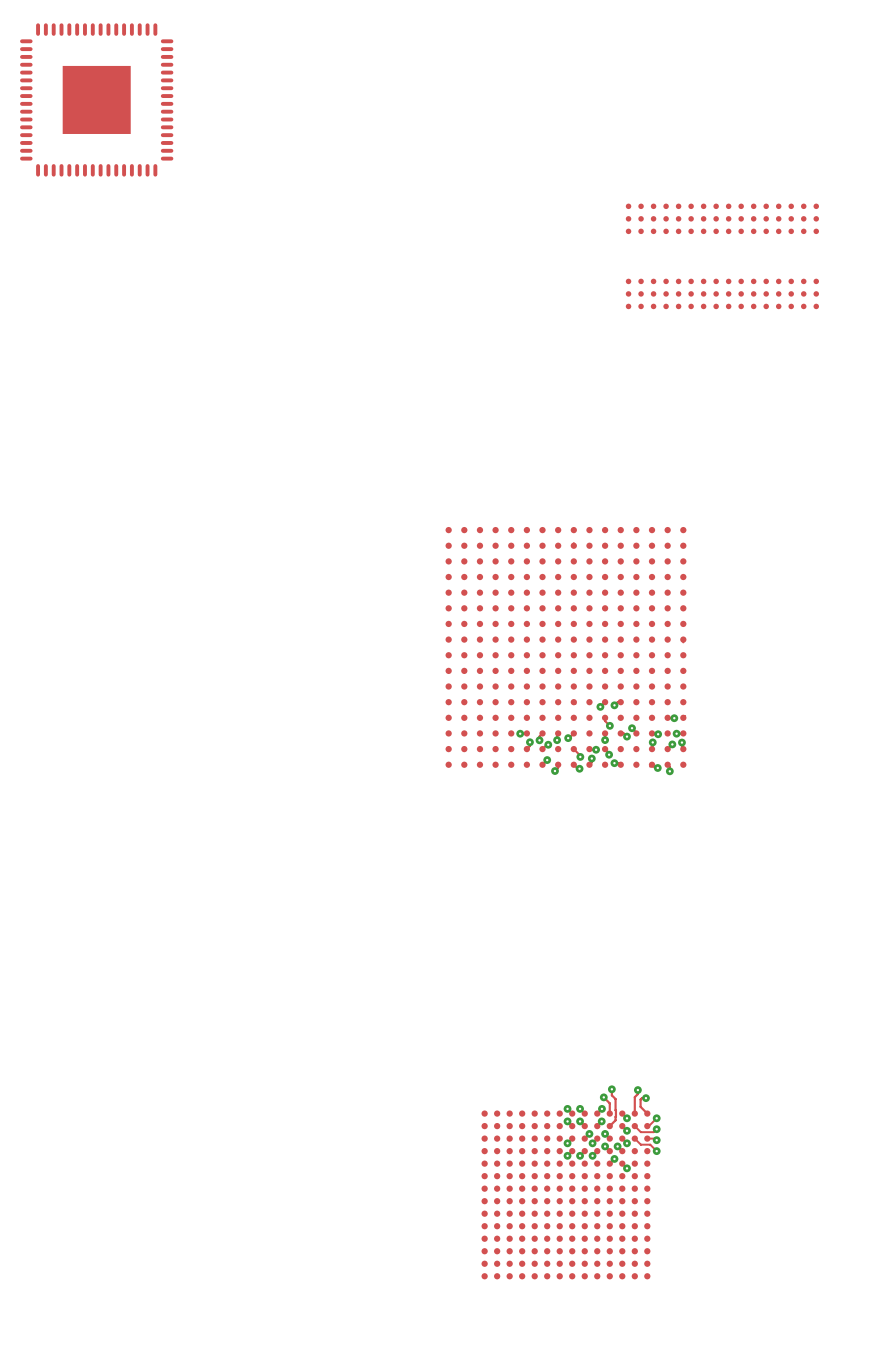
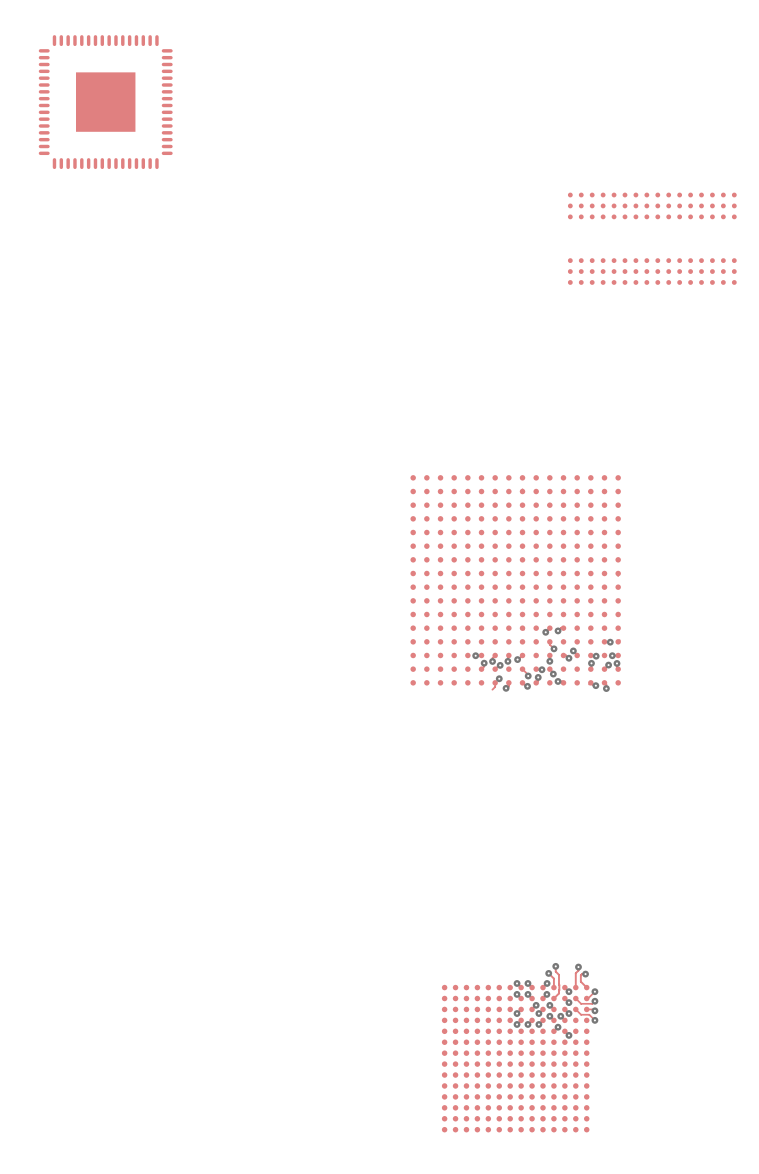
top track: none -> (495, 682) (495, 686) (492, 689)

